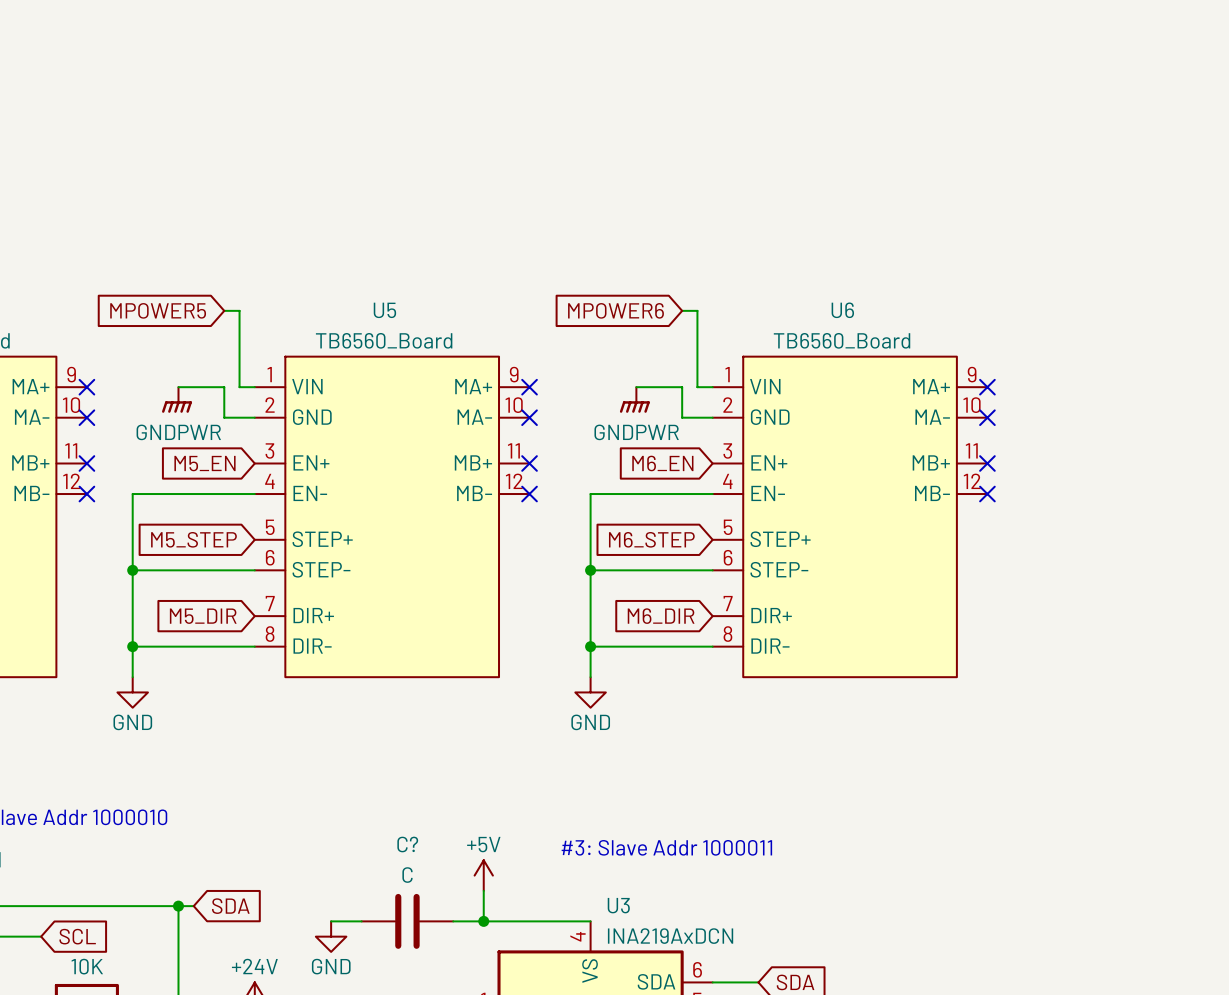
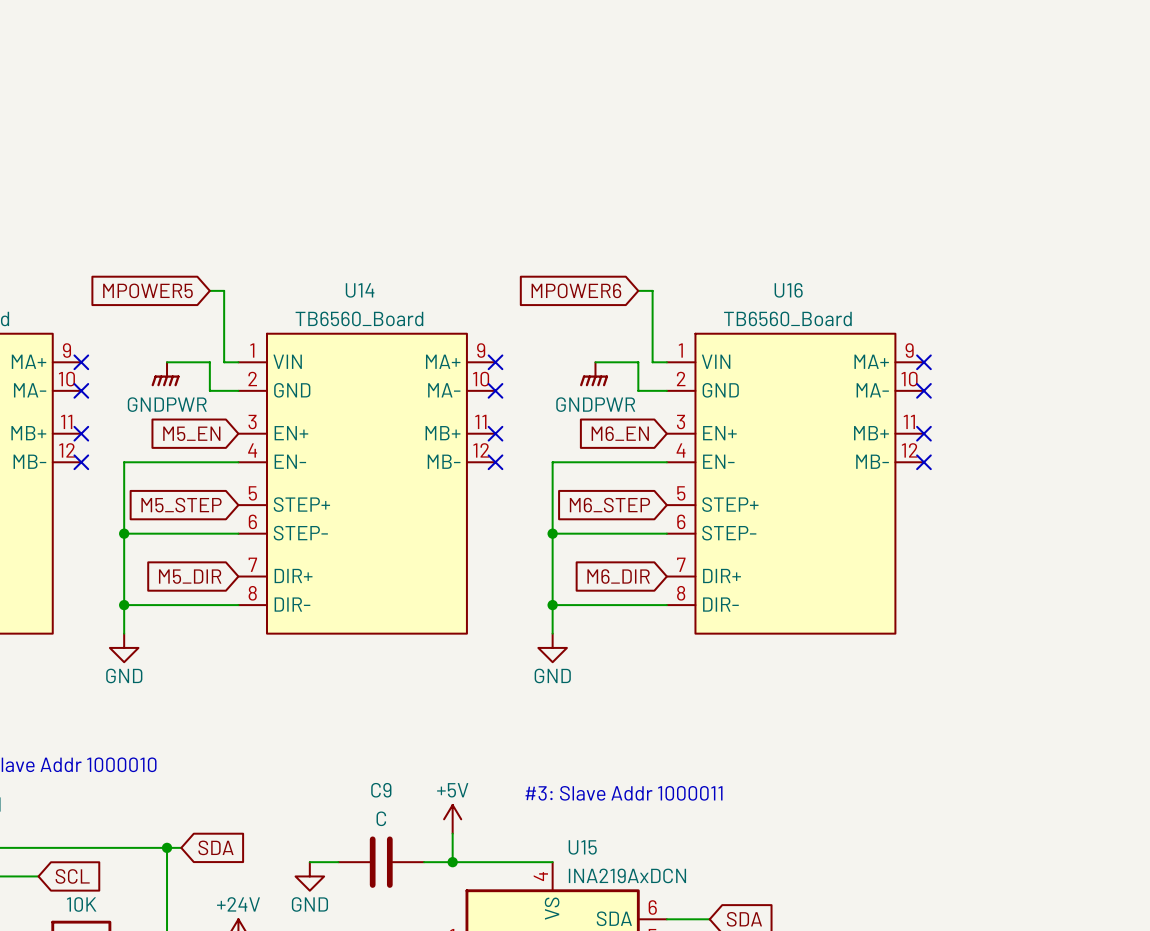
U5 name: U5 (384, 310) -> U14 (360, 290)
U6 name: U6 (842, 310) -> U16 (788, 290)
C? name: C? (407, 844) -> C9 (381, 790)
U3 name: U3 (618, 905) -> U15 (582, 847)

